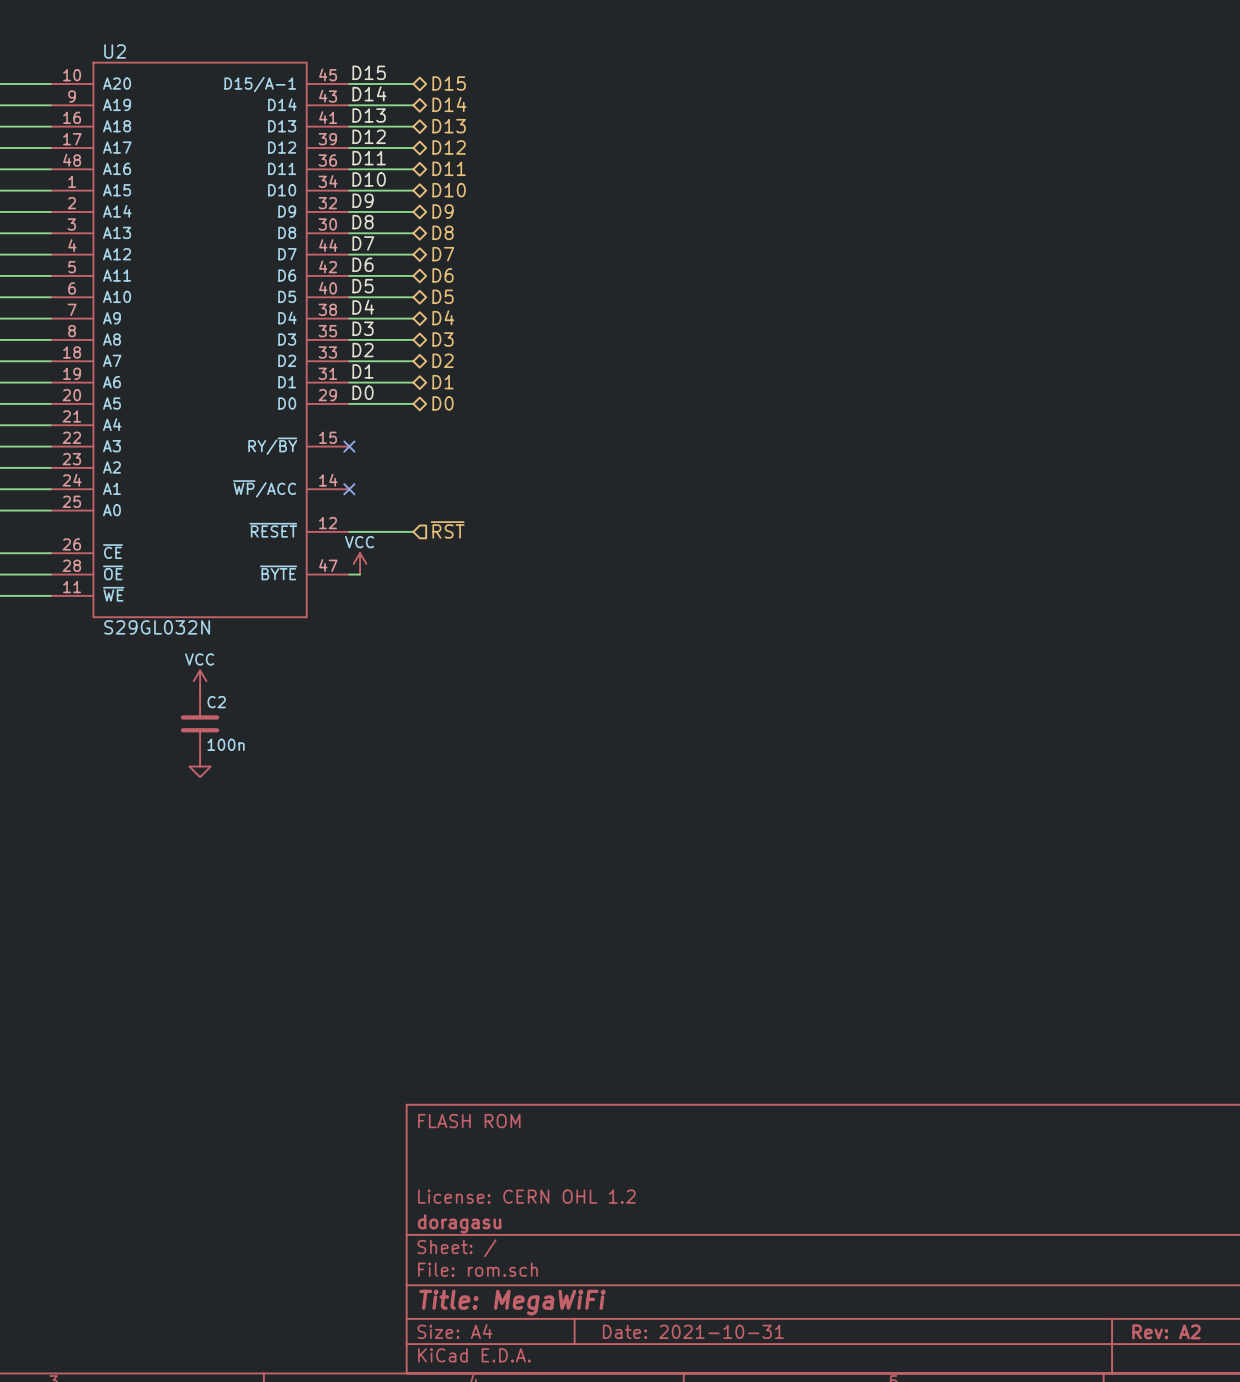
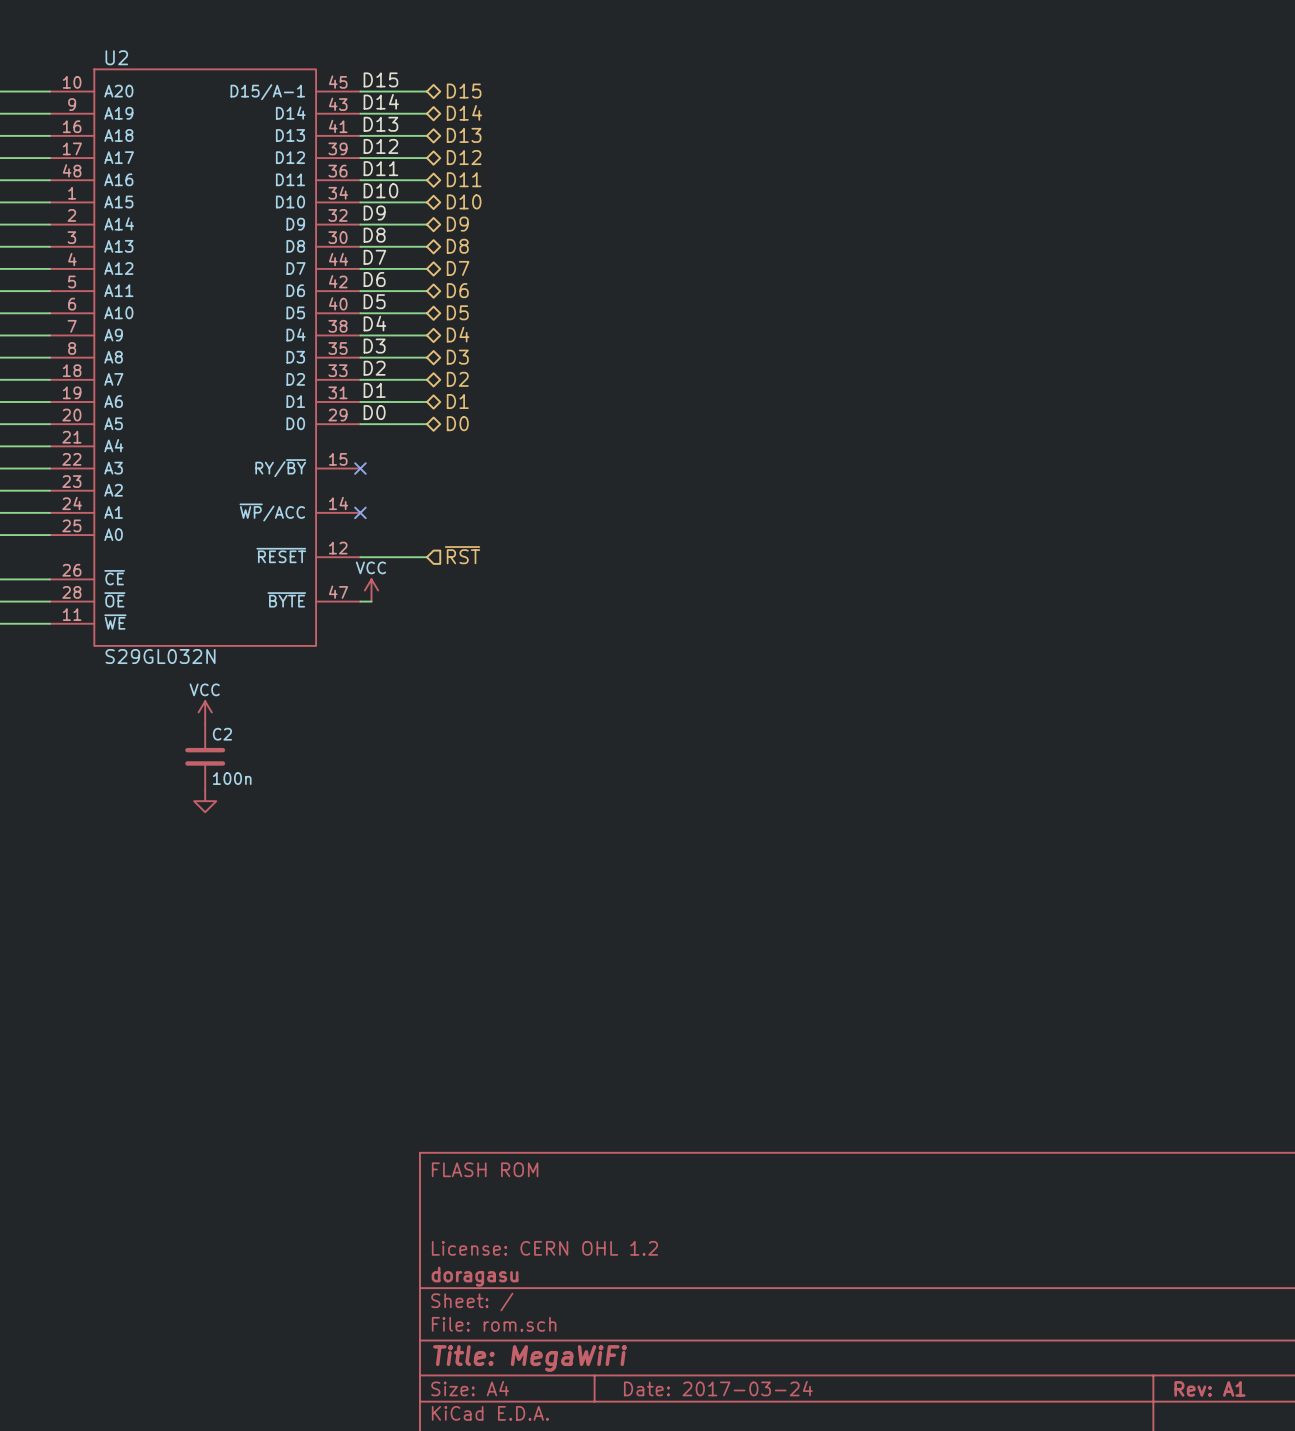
title block: Date: 2021-10-31 (693, 1331) -> Date: 2017-03-24 (718, 1388)
title block: Rev: A2 (1166, 1331) -> Rev: A1 (1209, 1388)

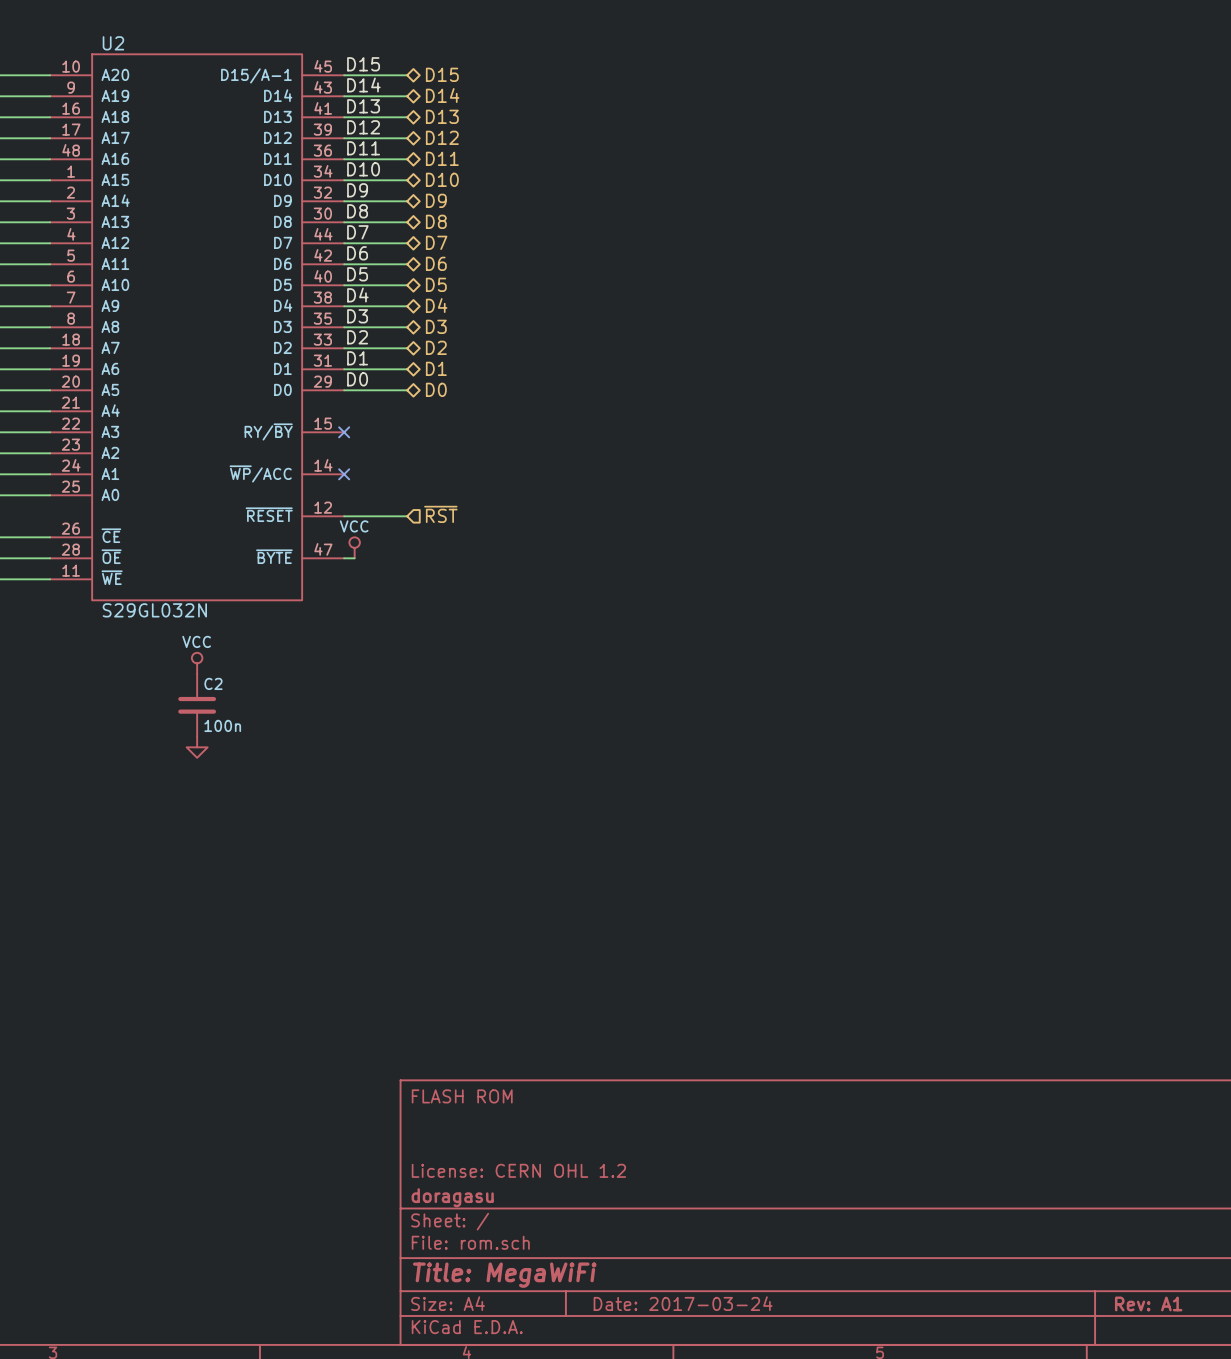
power symbol shape: [364, 579, 379, 602] -> [349, 537, 360, 559]
power symbol shape: [198, 701, 212, 724] -> [191, 652, 203, 674]

